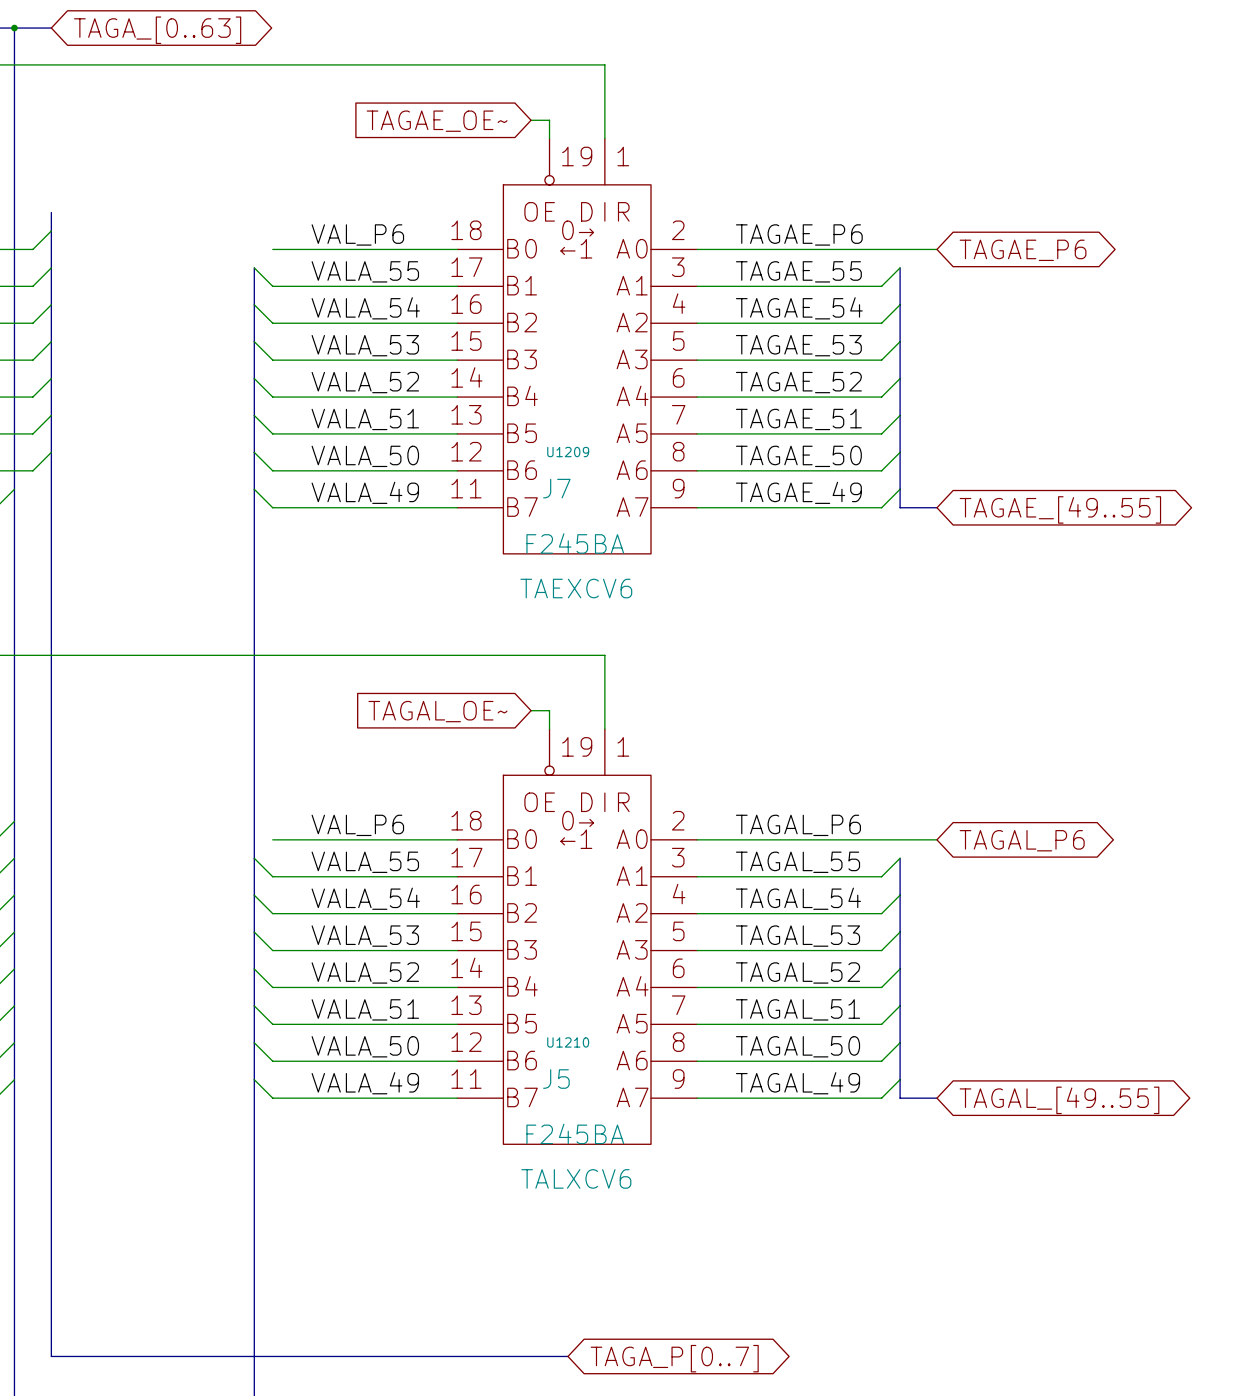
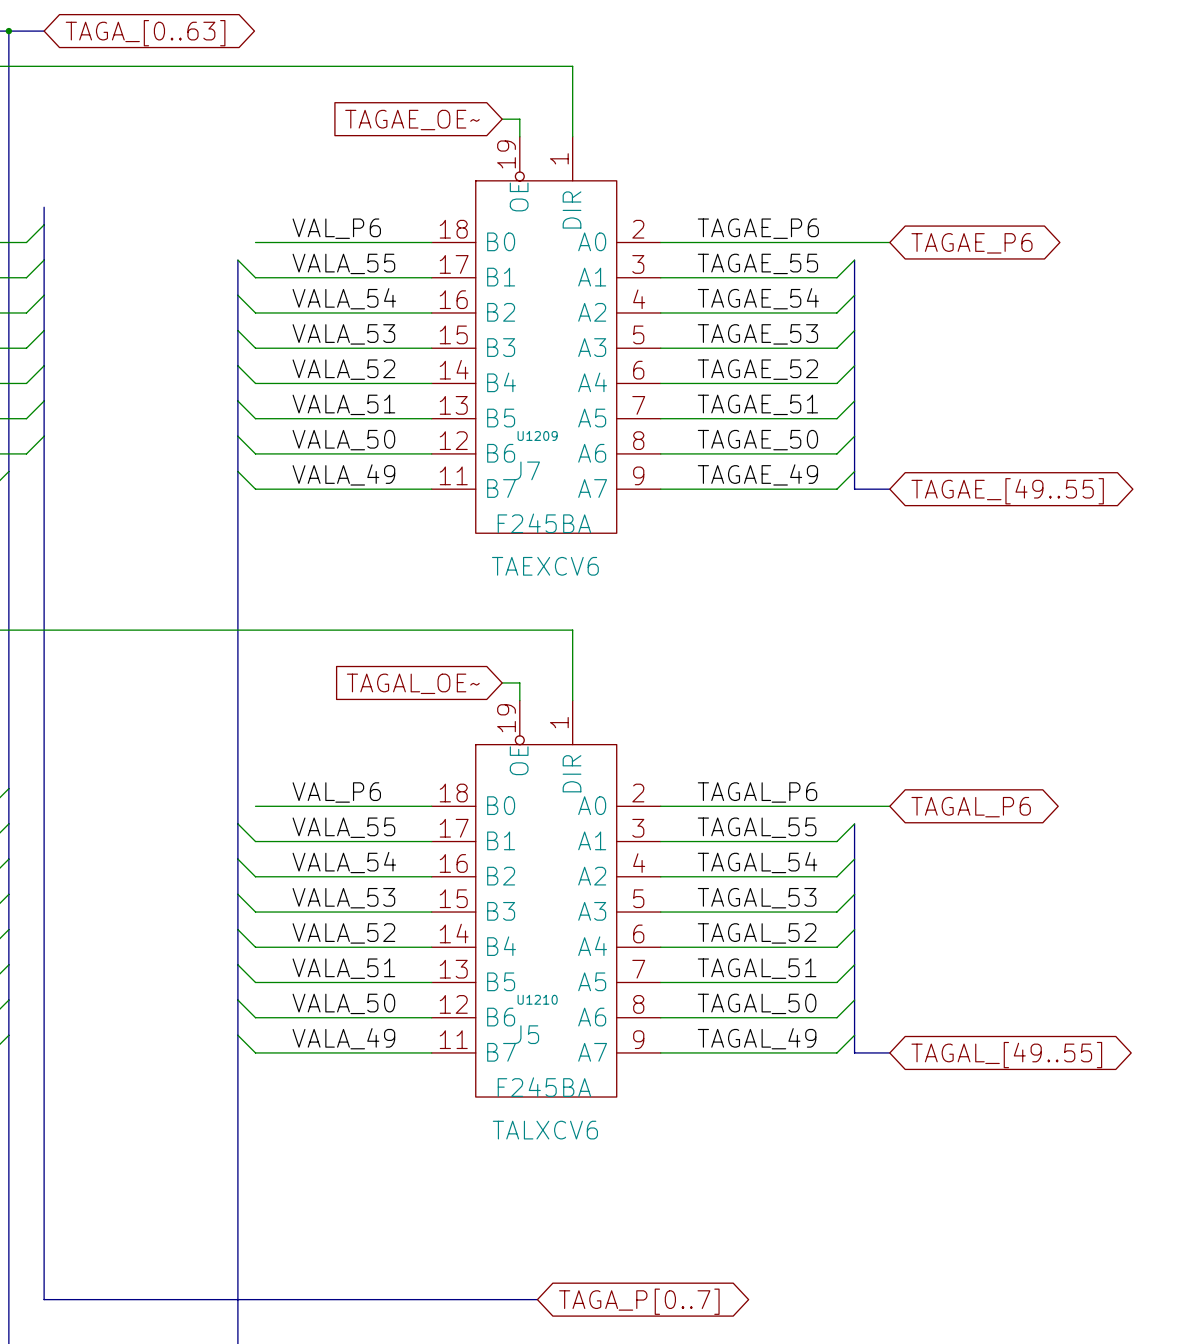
U1209 symbol: [457, 138, 698, 554] -> [431, 136, 661, 534]
U1210 symbol: [457, 729, 698, 1145] -> [431, 700, 661, 1098]

